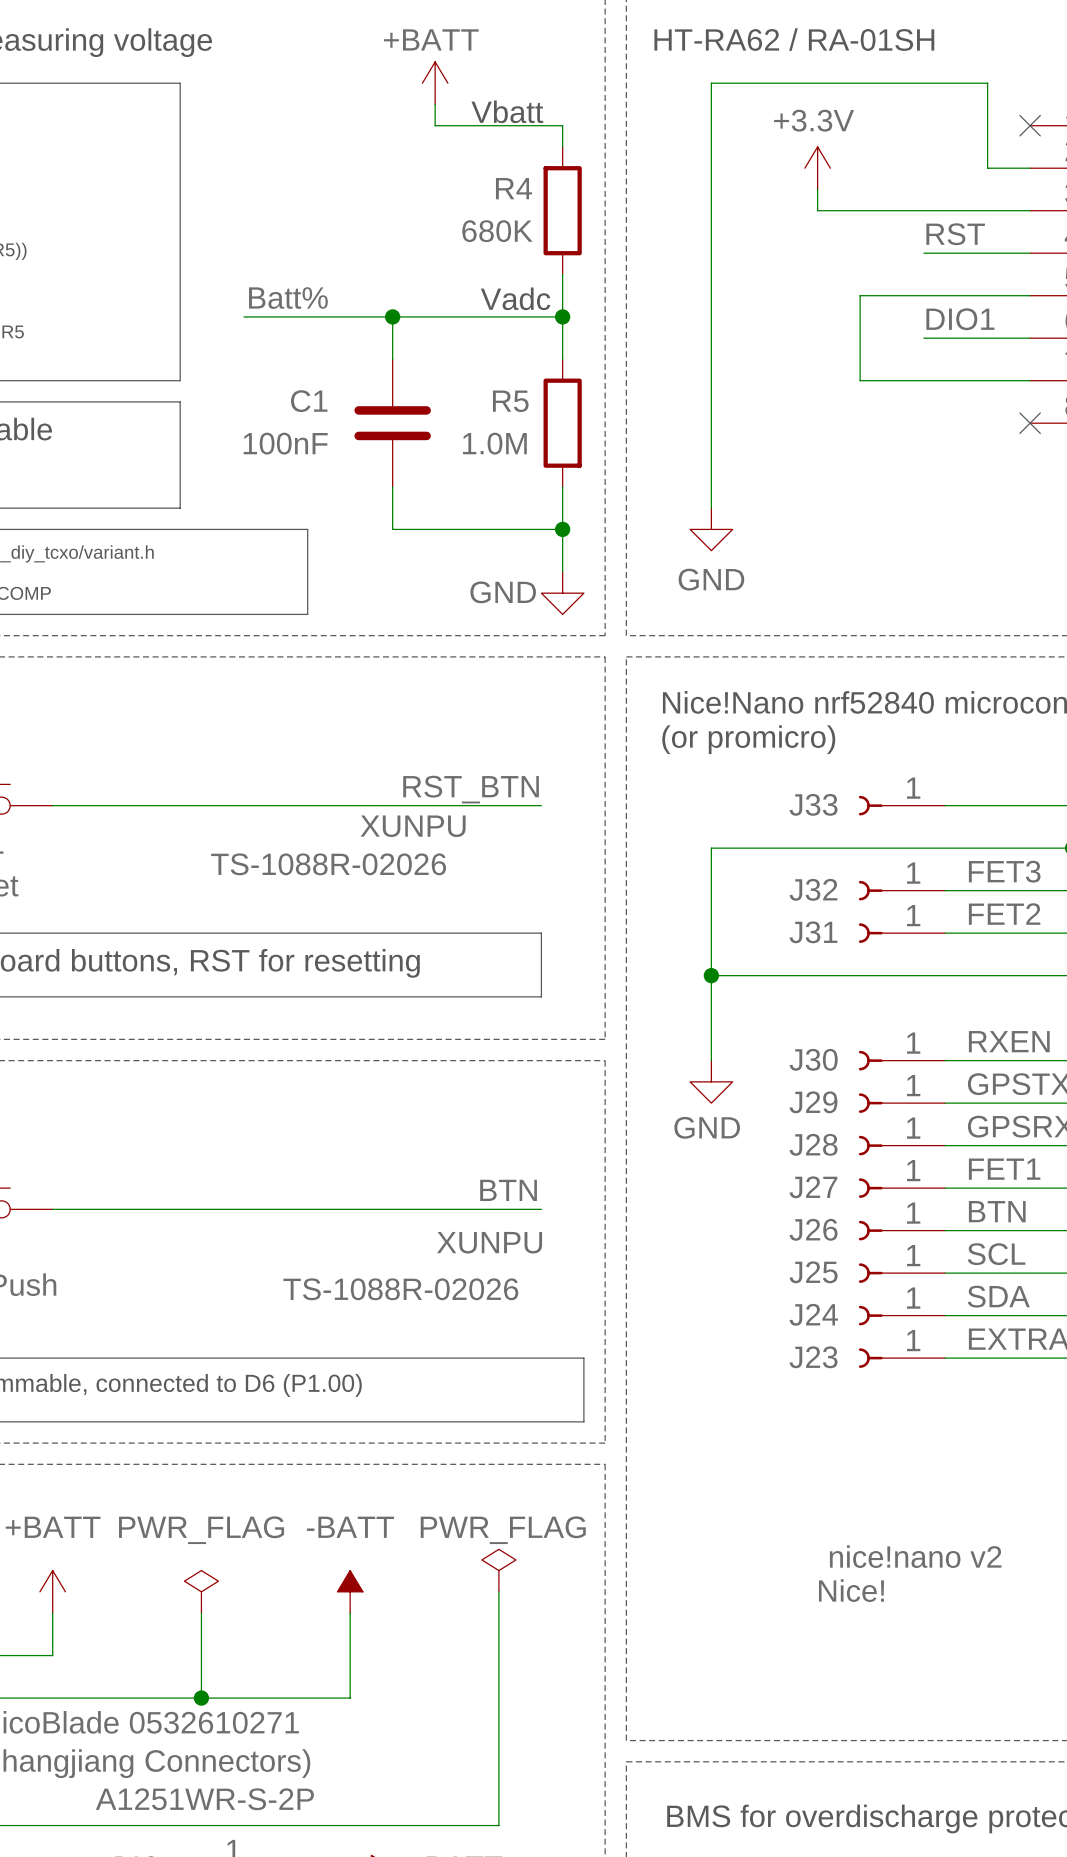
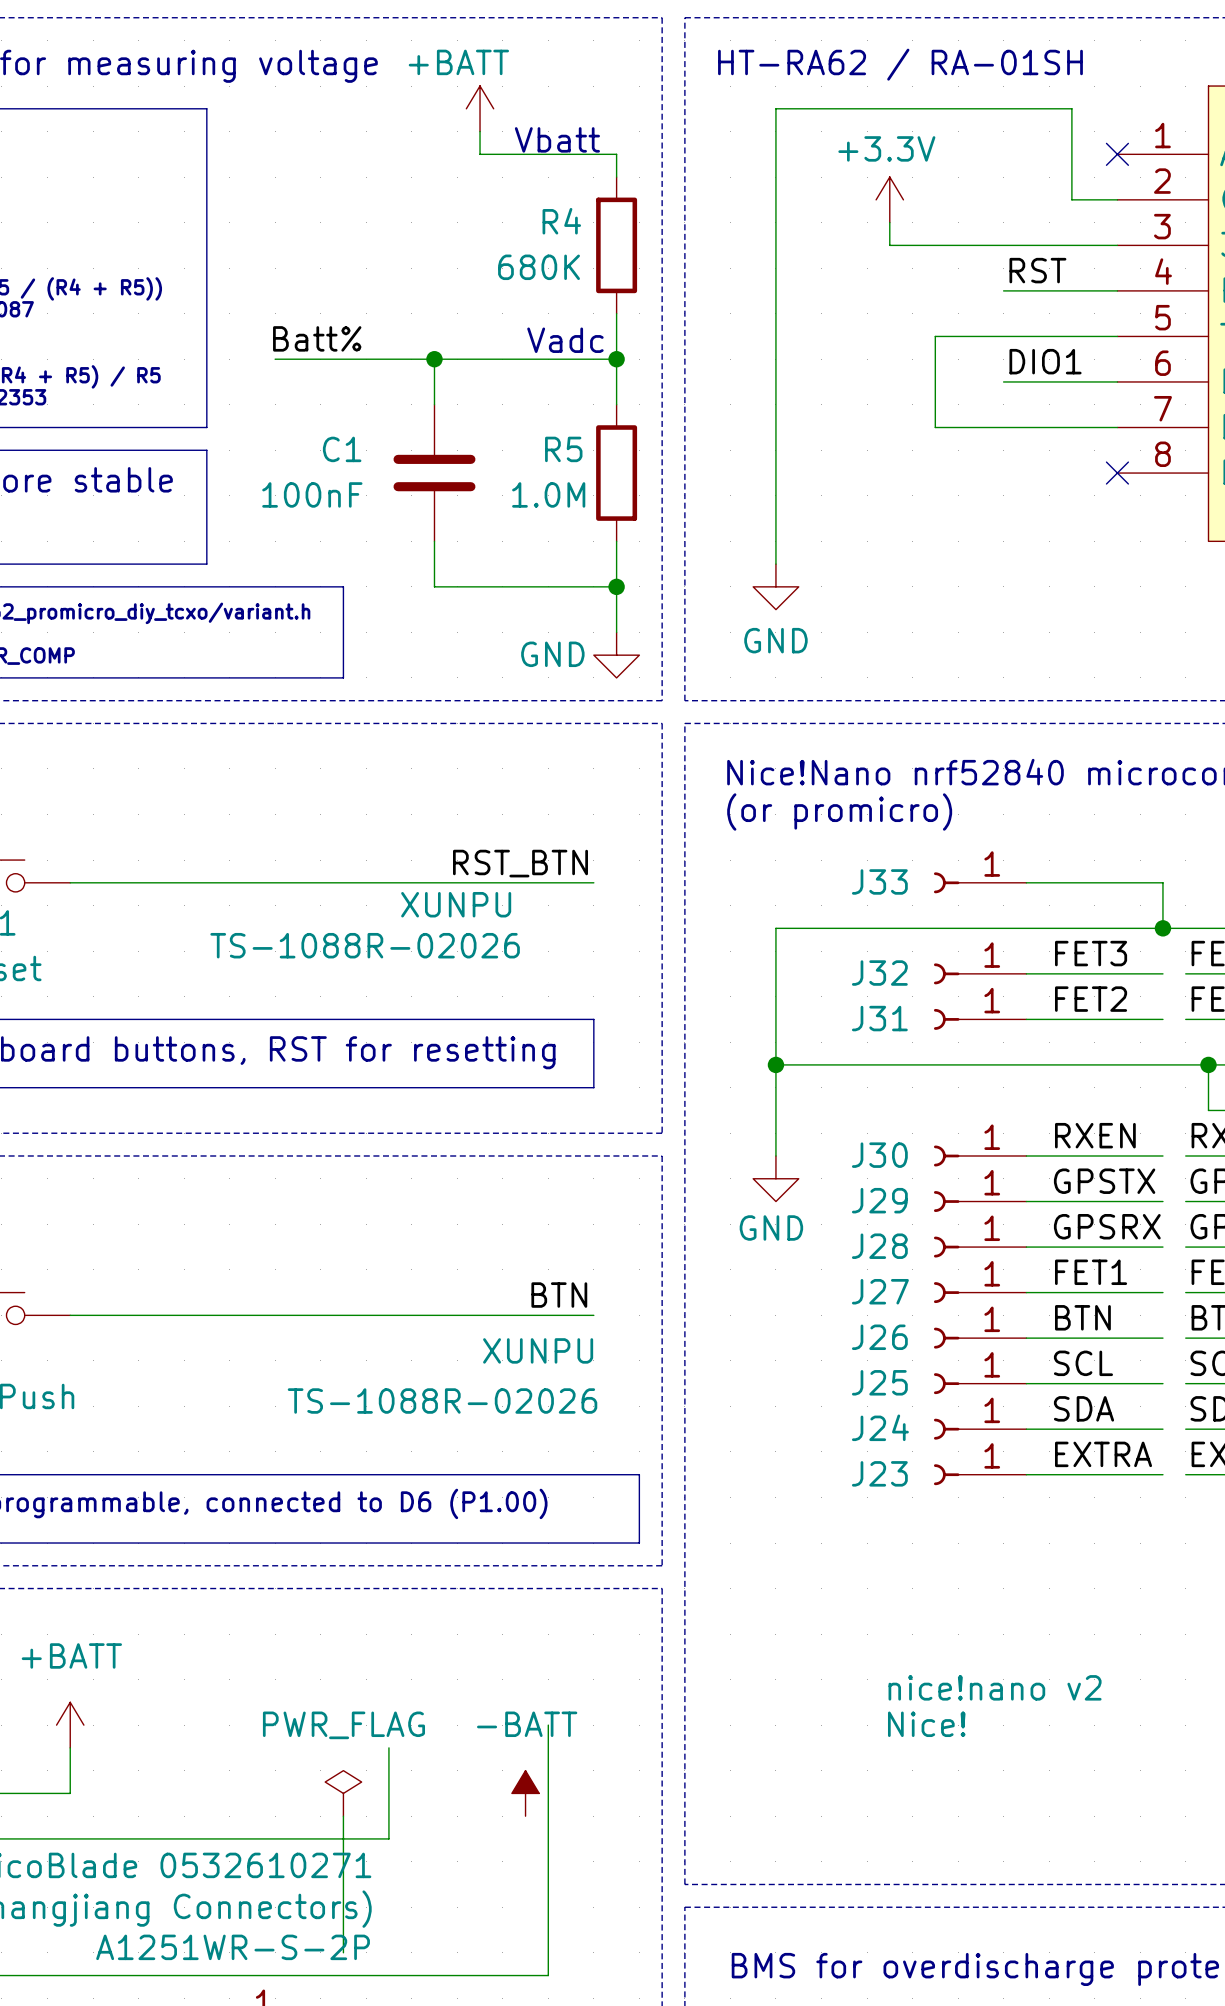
power symbol text position: +BATT (431, 39) -> +BATT (458, 62)
power symbol: PWR_FLAG (498, 1570) -> none
power symbol: PWR_FLAG (201, 1591) -> none
power symbol position: -BATT (350, 1591) -> -BATT (525, 1793)
wire: (201, 1613) (201, 1698) -> none
power symbol: none -> PWR_FLAG (343, 1793)
wire: none -> (343, 1816) (343, 1952)
junction: (201, 1698) -> none

